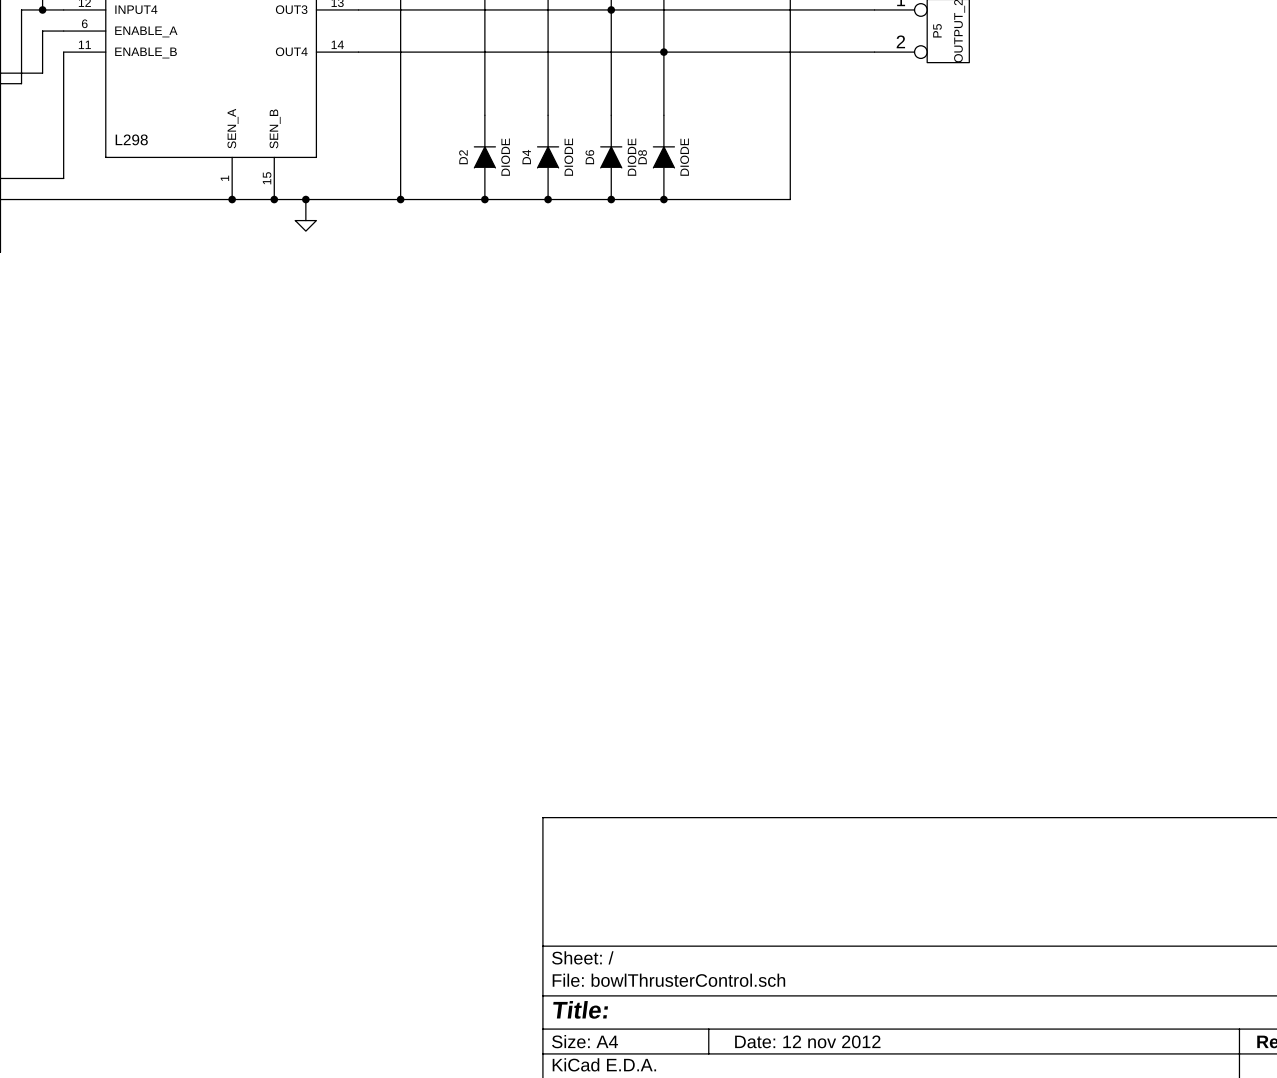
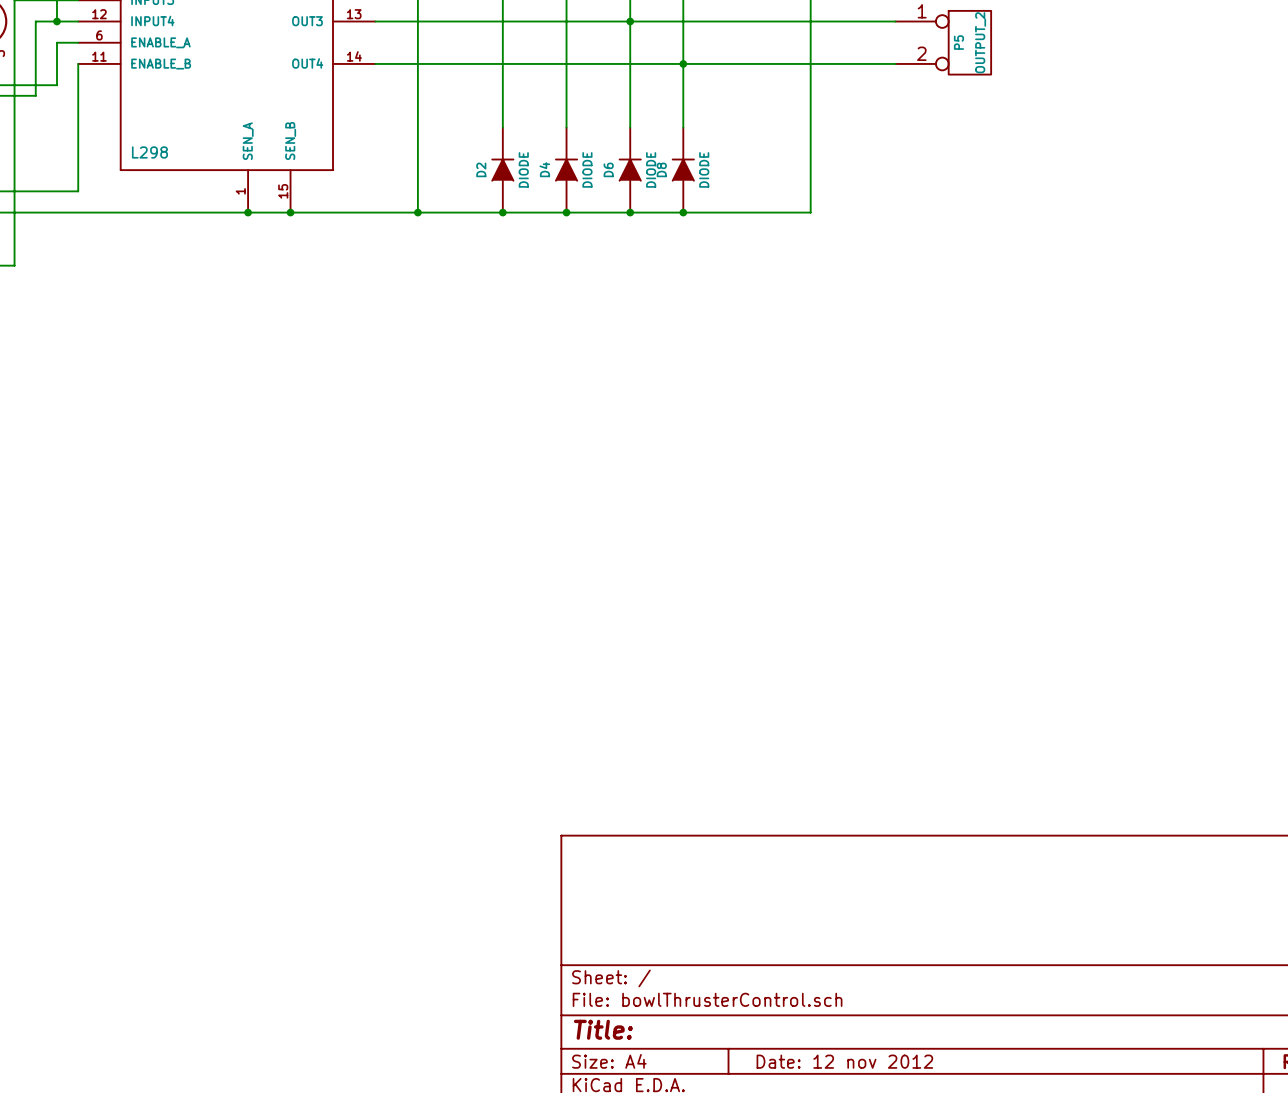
wire: (305, 199) (305, 220) -> none
junction: (305, 199) -> none
power symbol: (305, 225) -> none

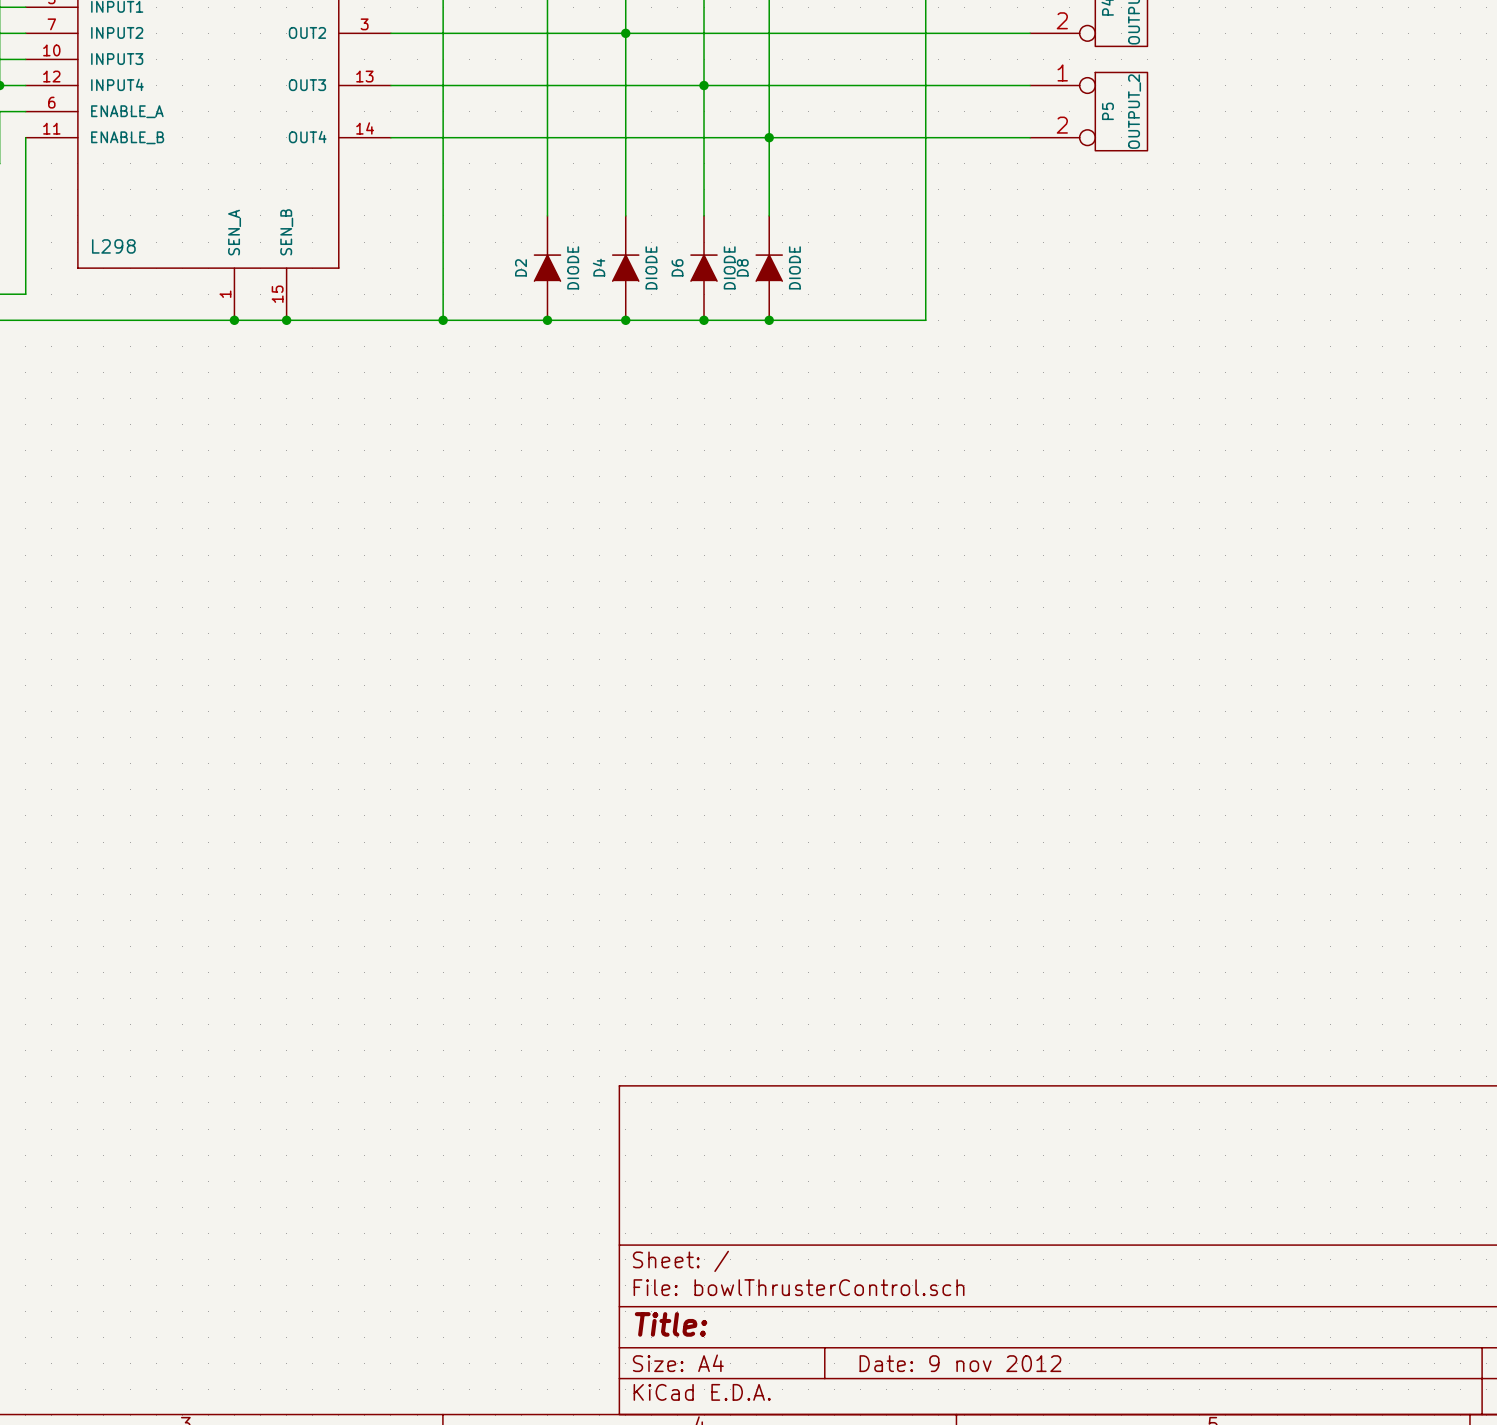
title block: Date: 12 nov 2012 (844, 1061) -> Date: 9 nov 2012 (960, 1363)

